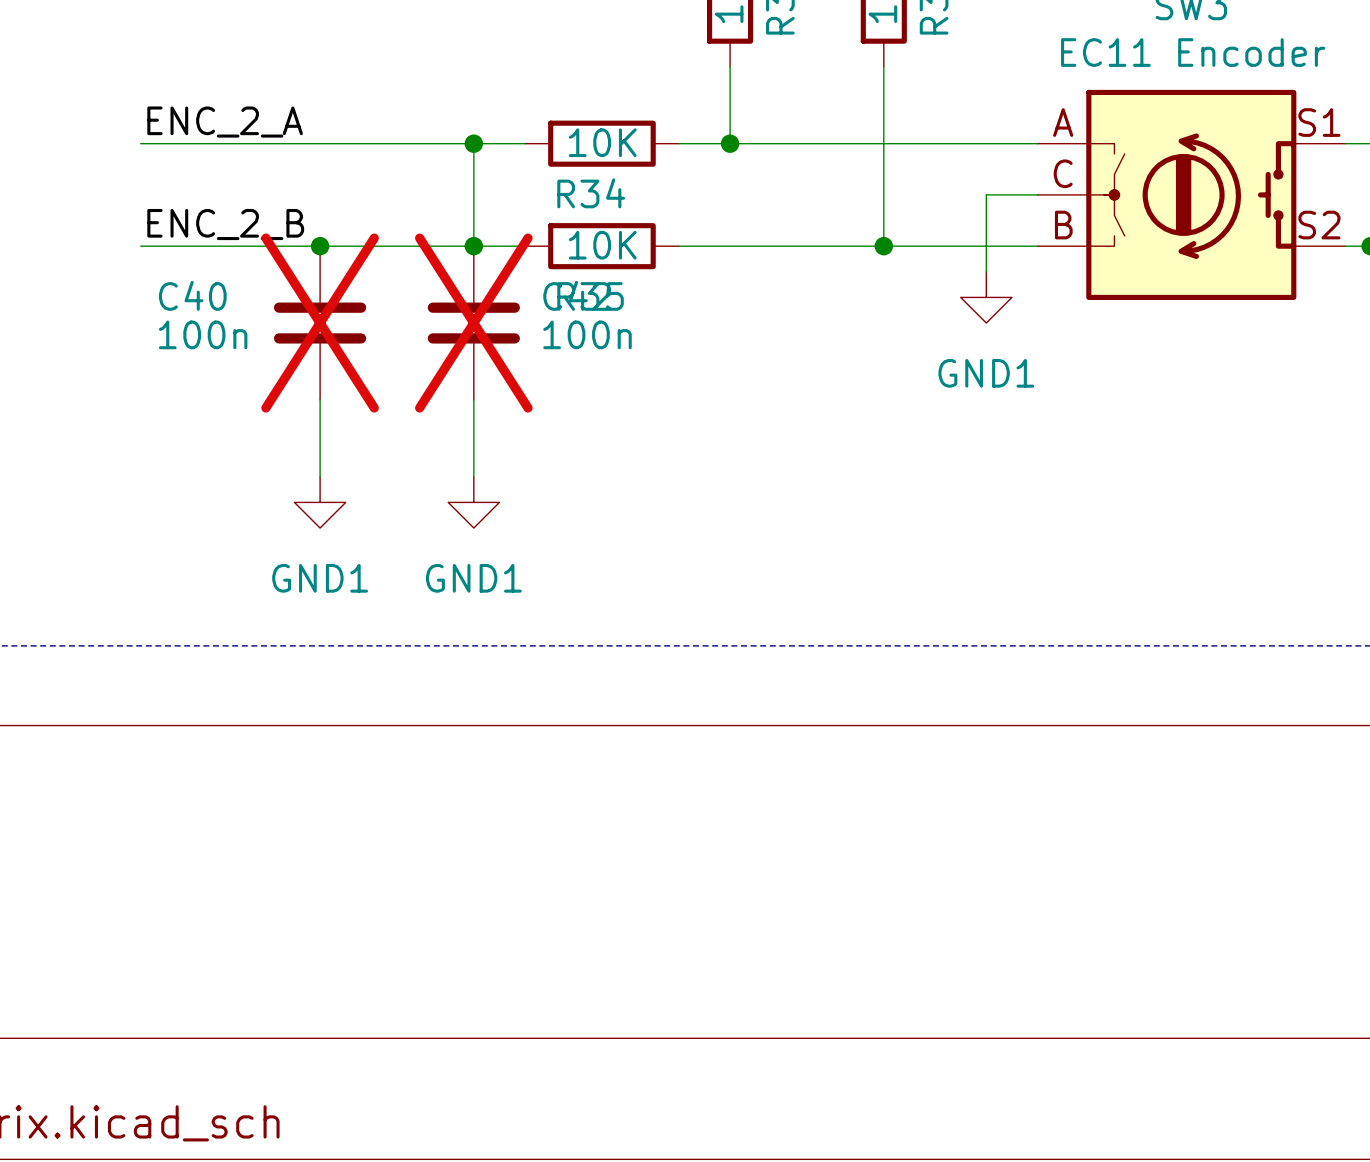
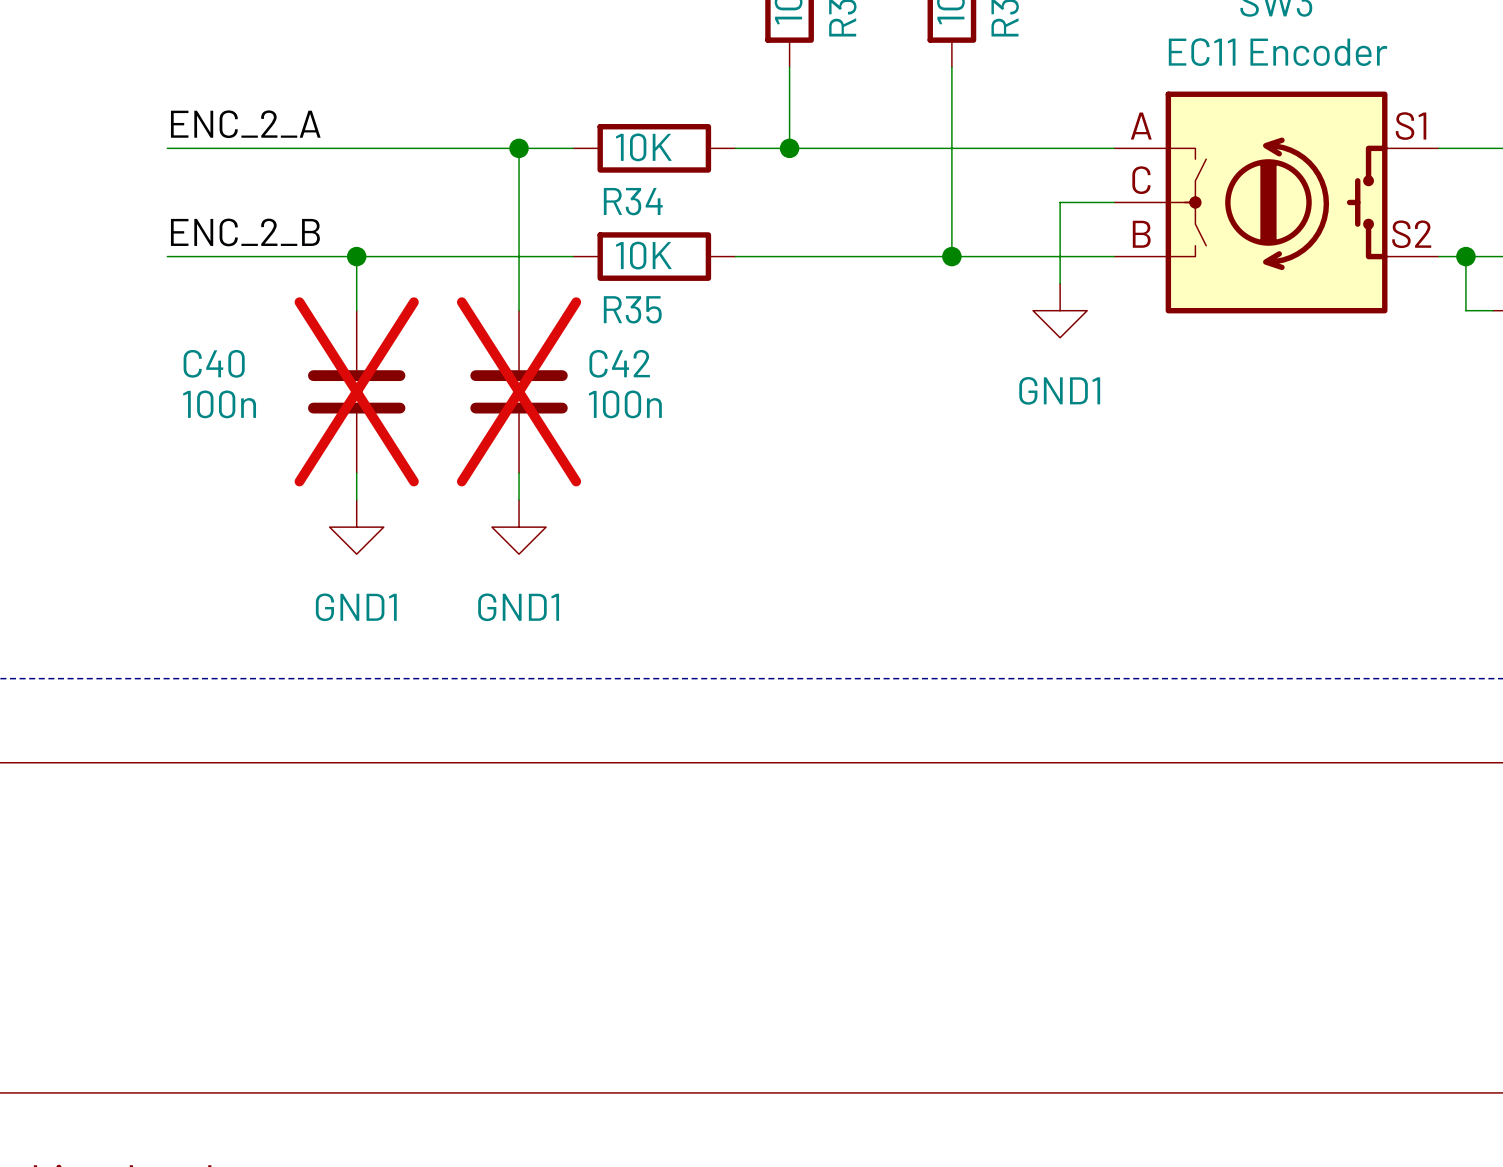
junction: (473, 246) -> none
C40 position: (320, 323) -> (356, 391)
C42 position: (473, 323) -> (519, 391)

